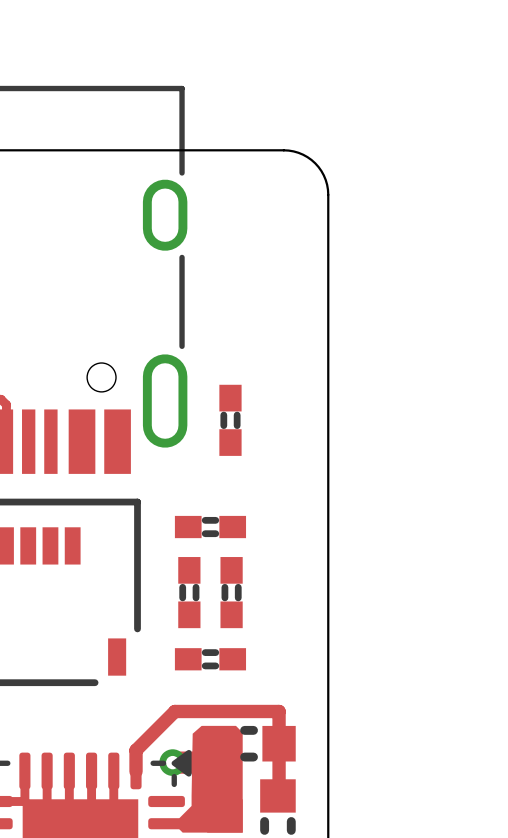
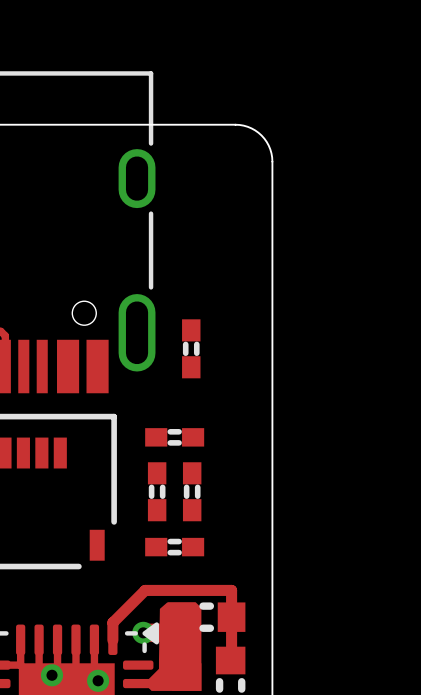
via: none -> (52, 675)
via: none -> (98, 680)

